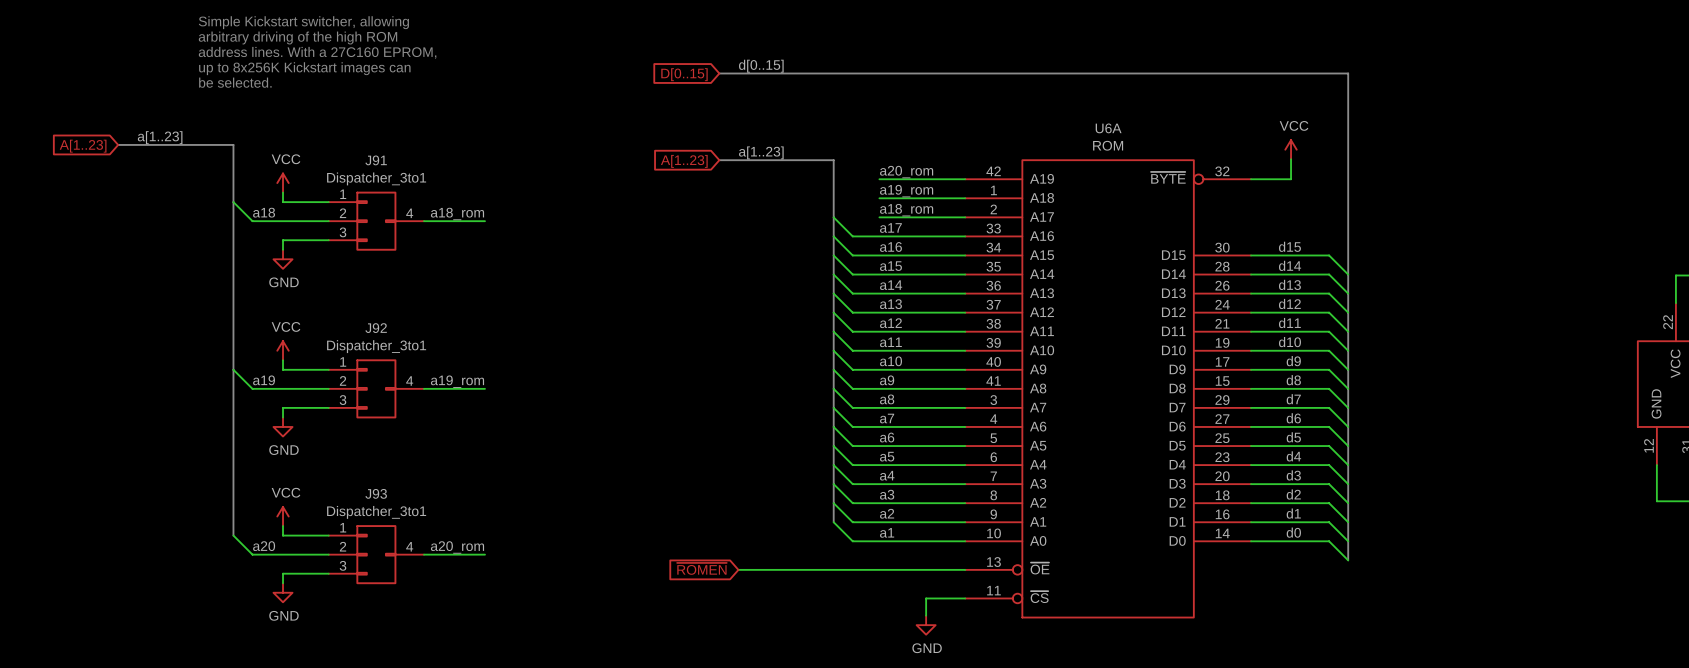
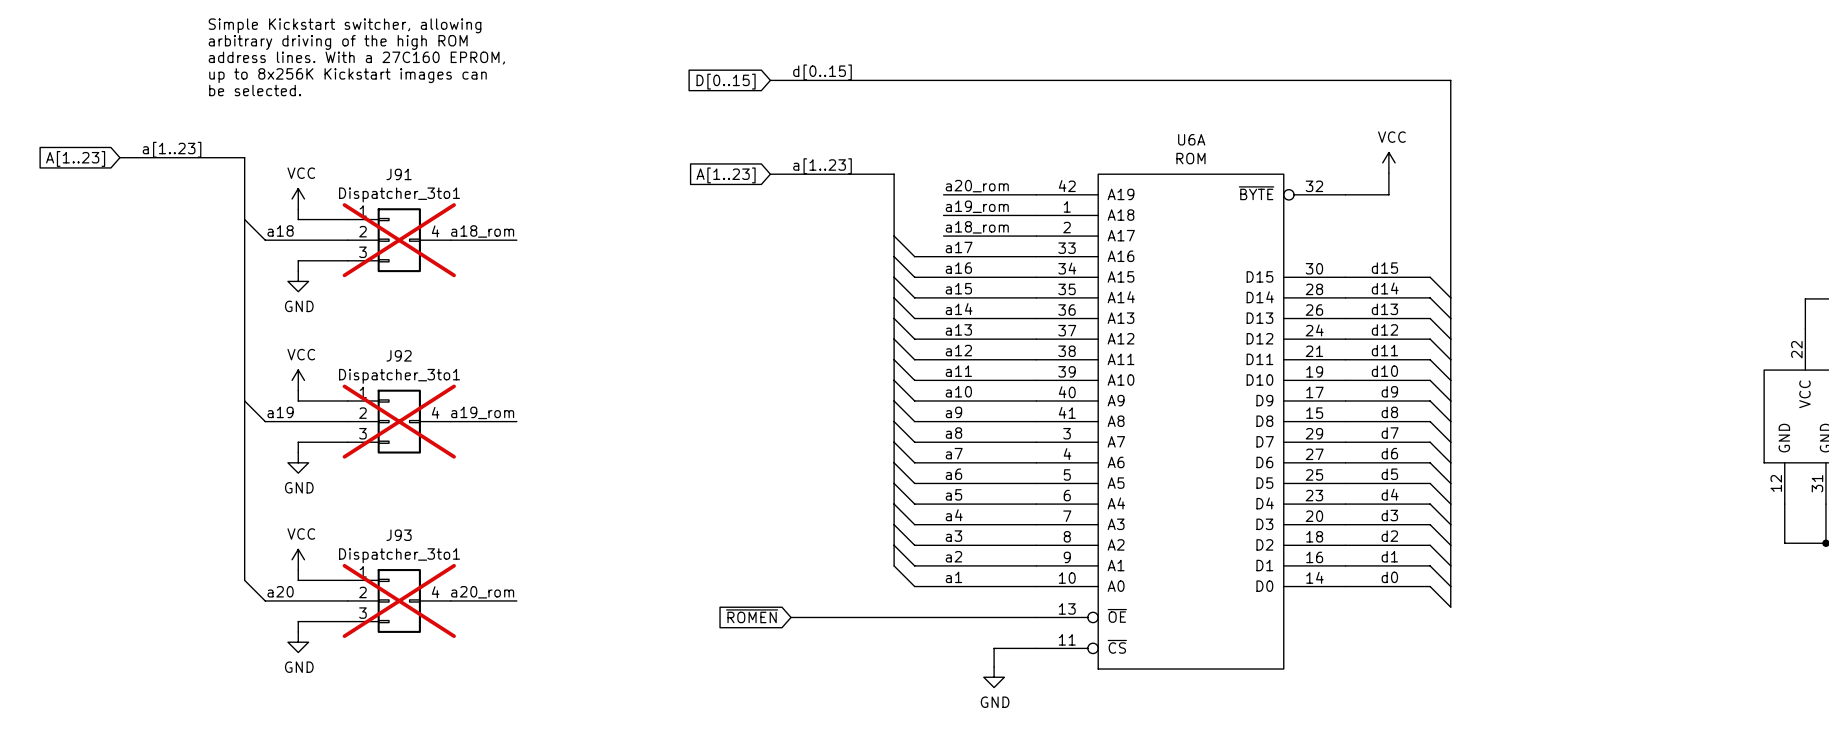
J91 do-not-place cross: none -> (399, 240)
J92 do-not-place cross: none -> (399, 421)
J93 do-not-place cross: none -> (399, 600)

